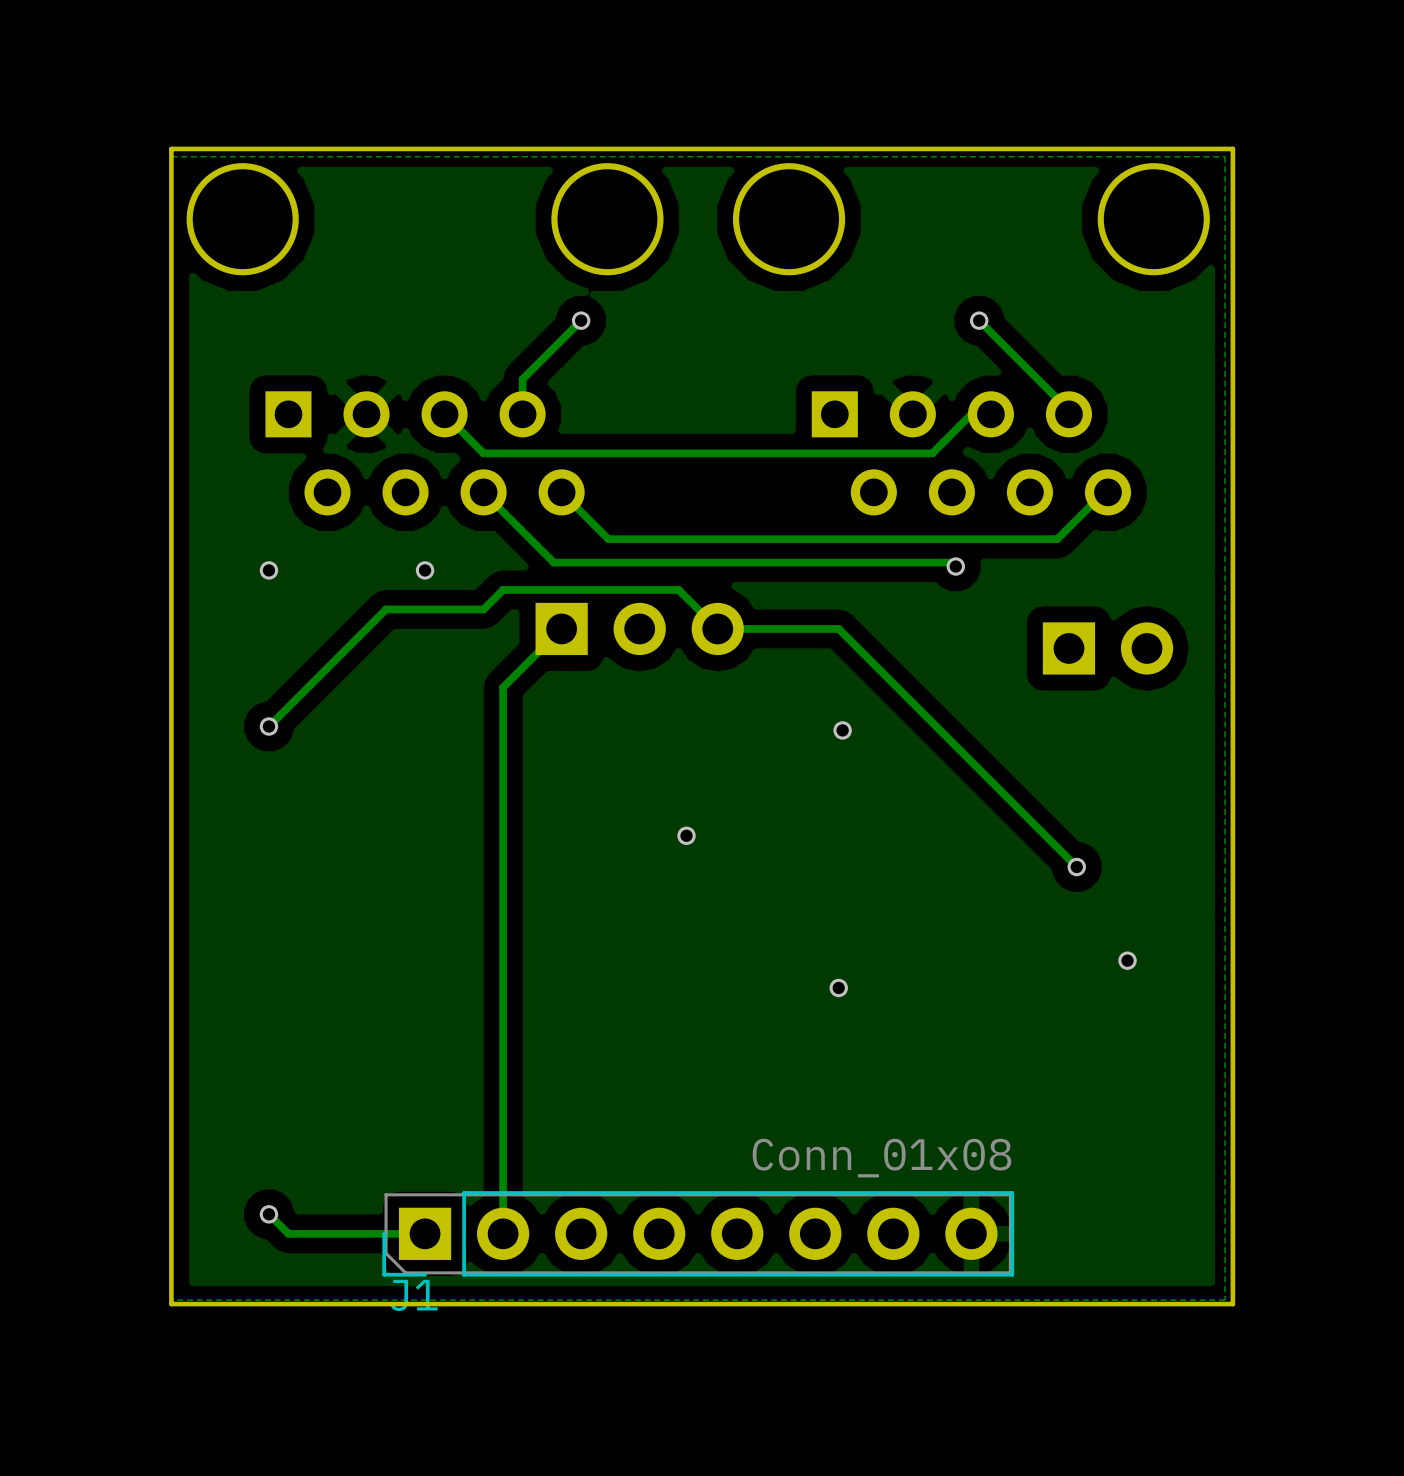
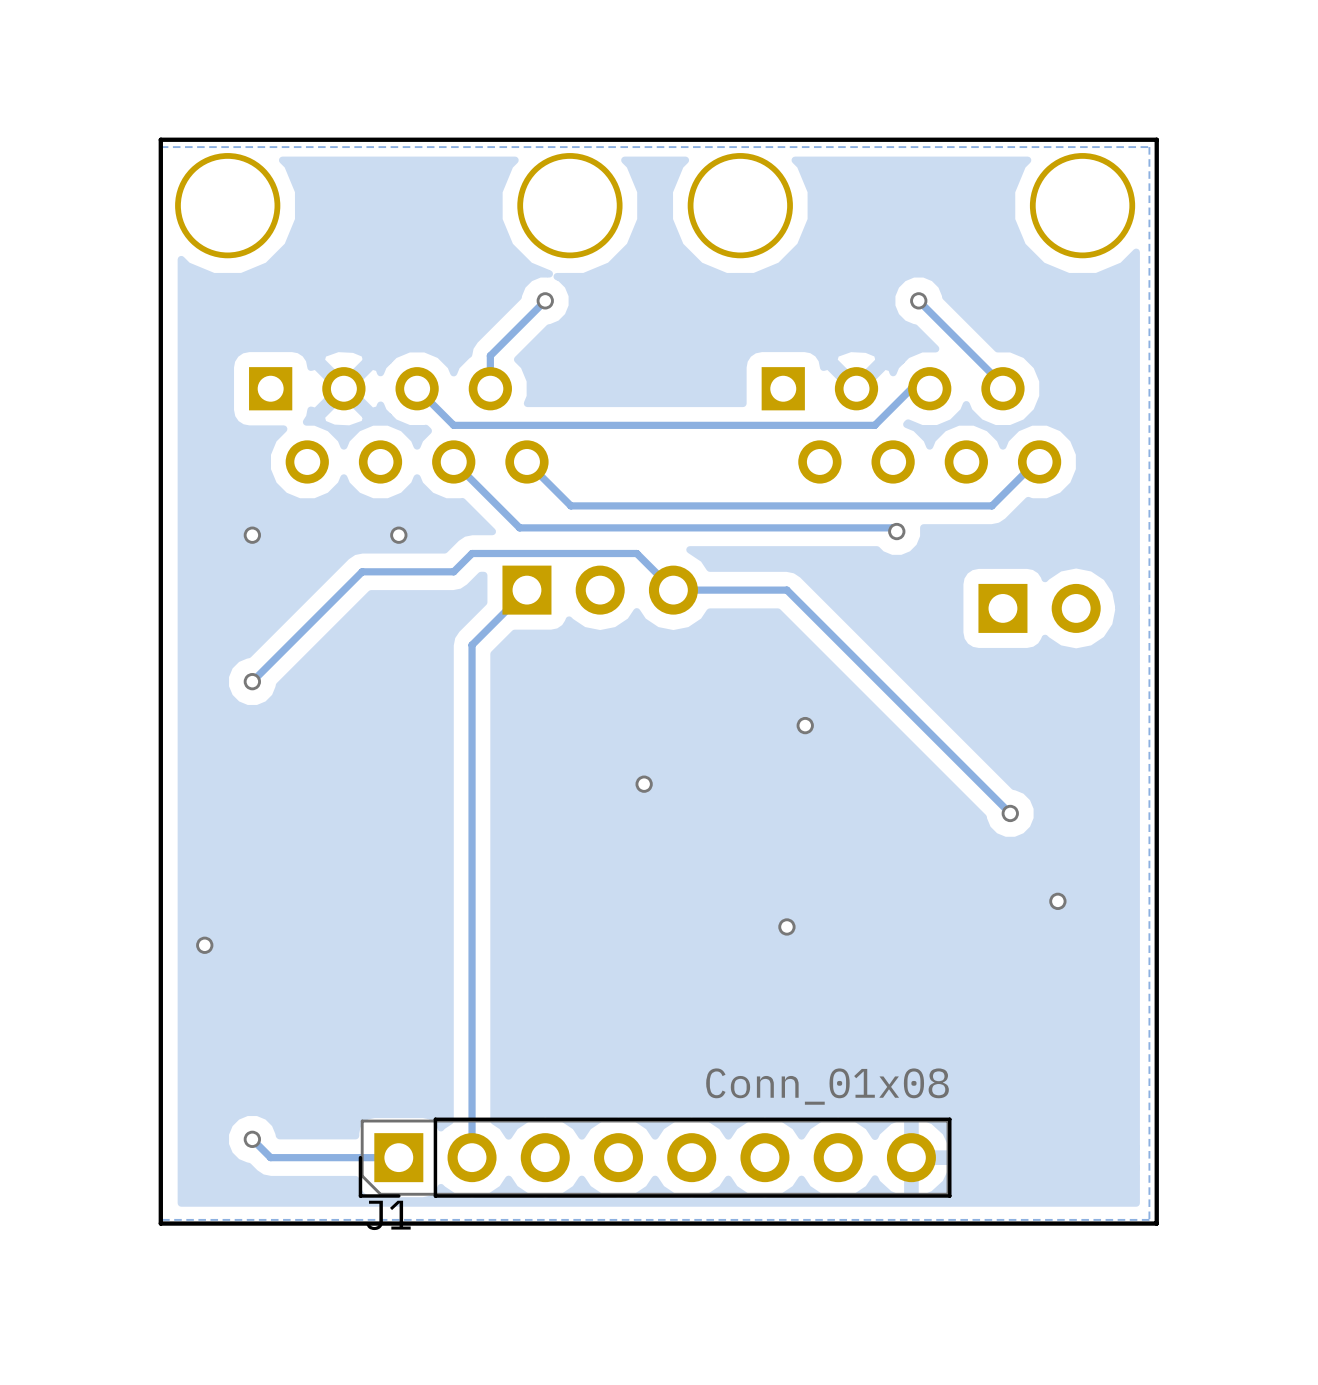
via position: (842, 730) -> (805, 725)
via: none -> (204, 945)

